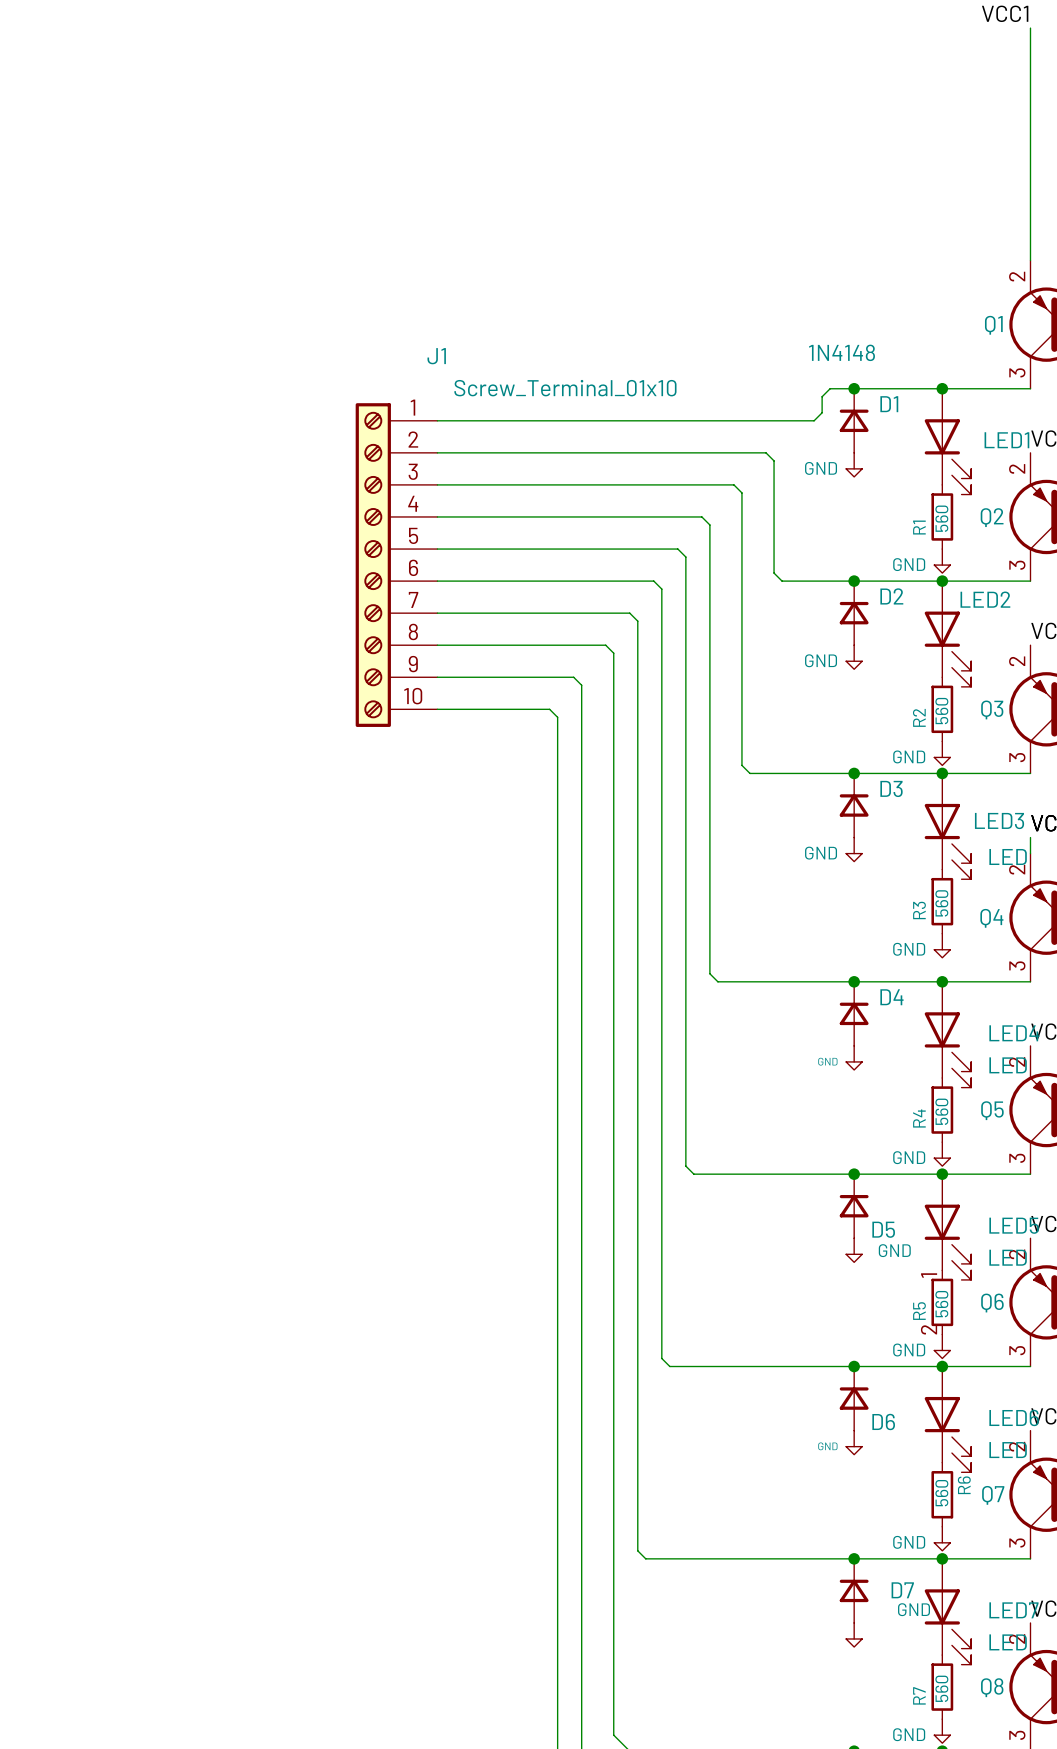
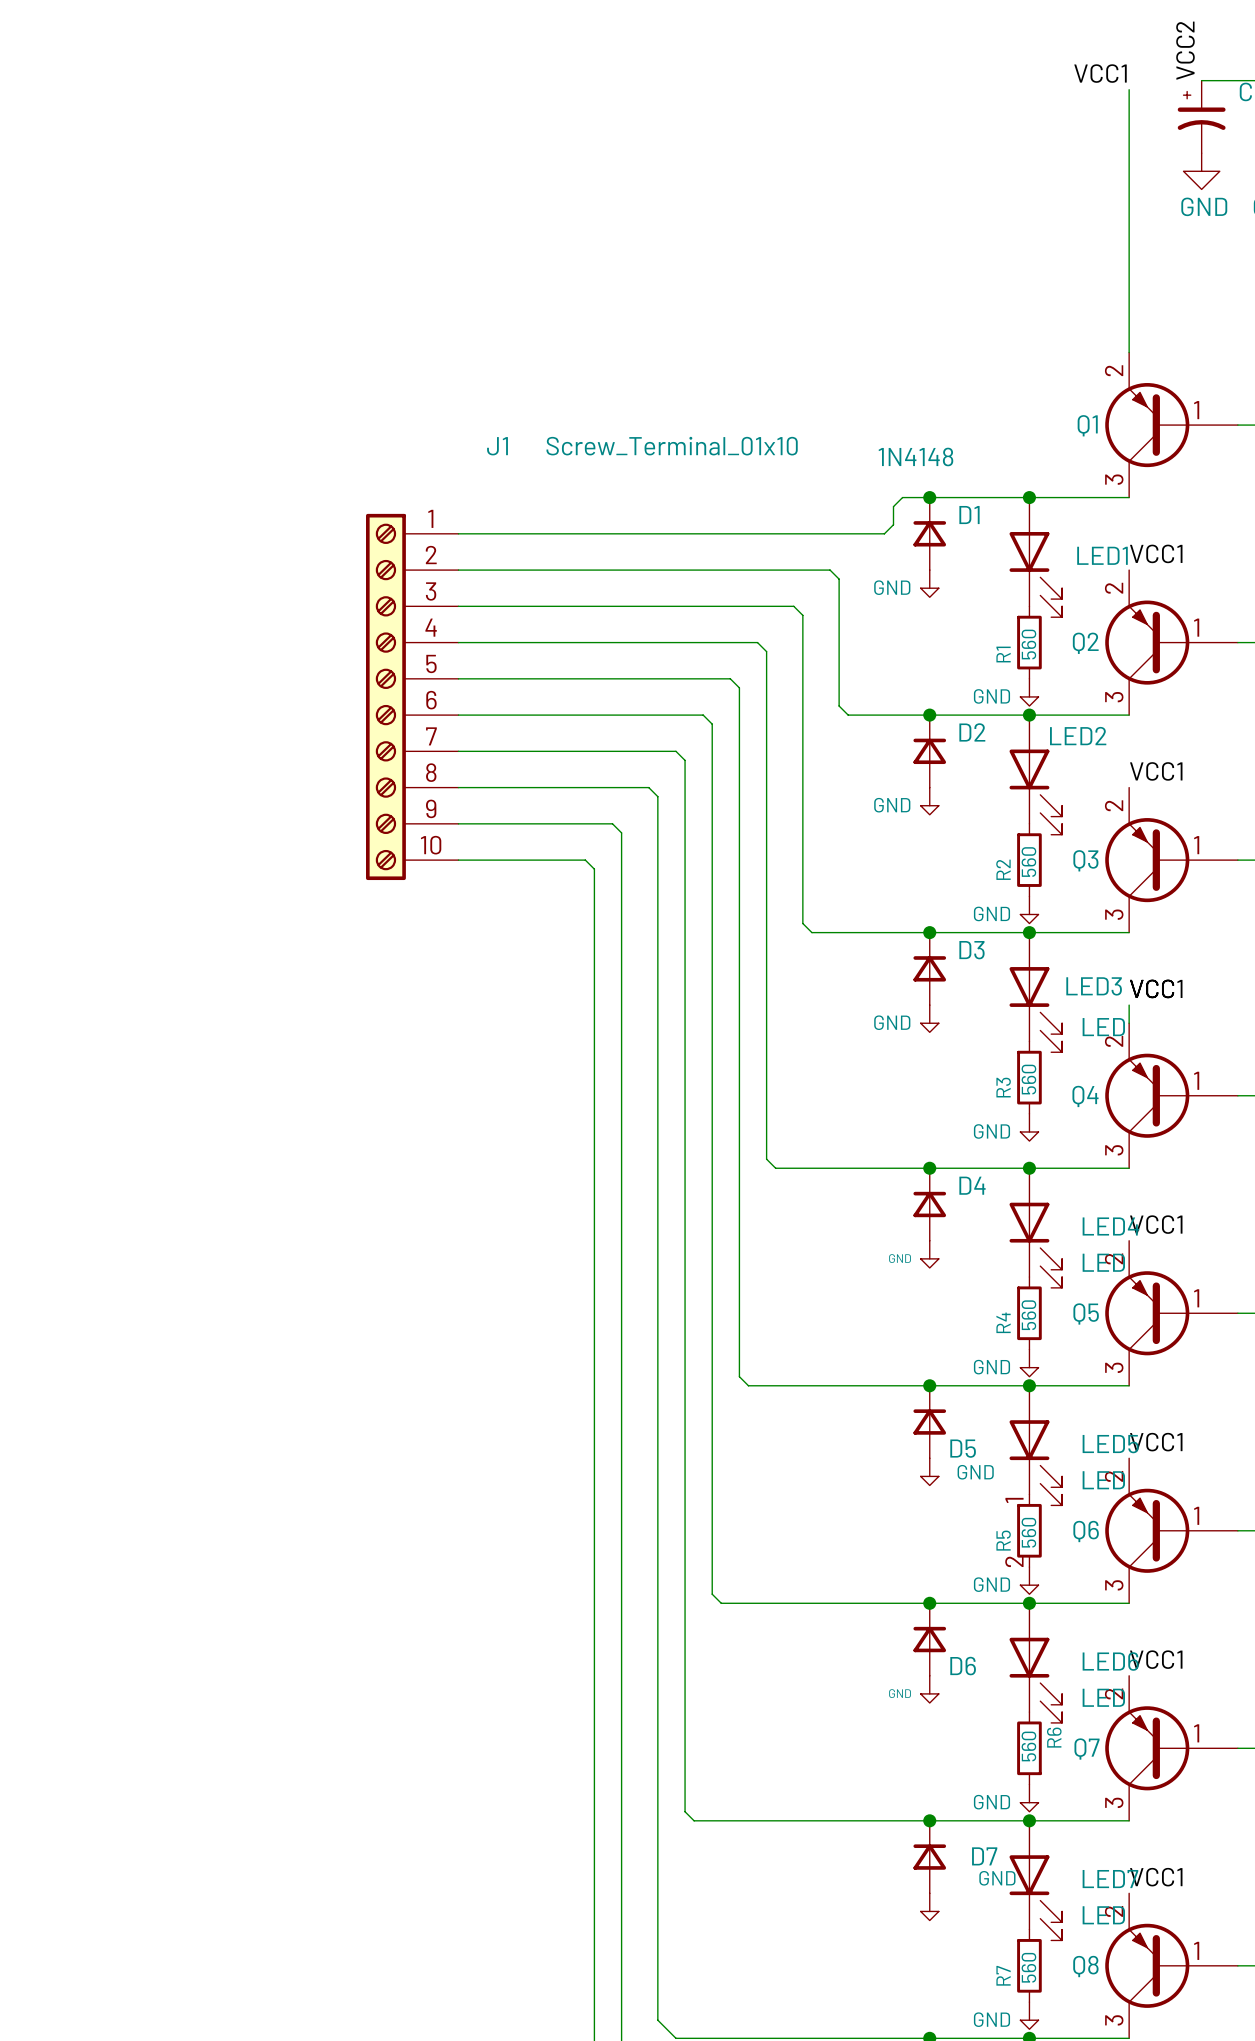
J1 name position: J1 (436, 356) -> J1 (497, 446)
J1 value position: Screw_Terminal_01x10 (565, 388) -> Screw_Terminal_01x10 (672, 446)

